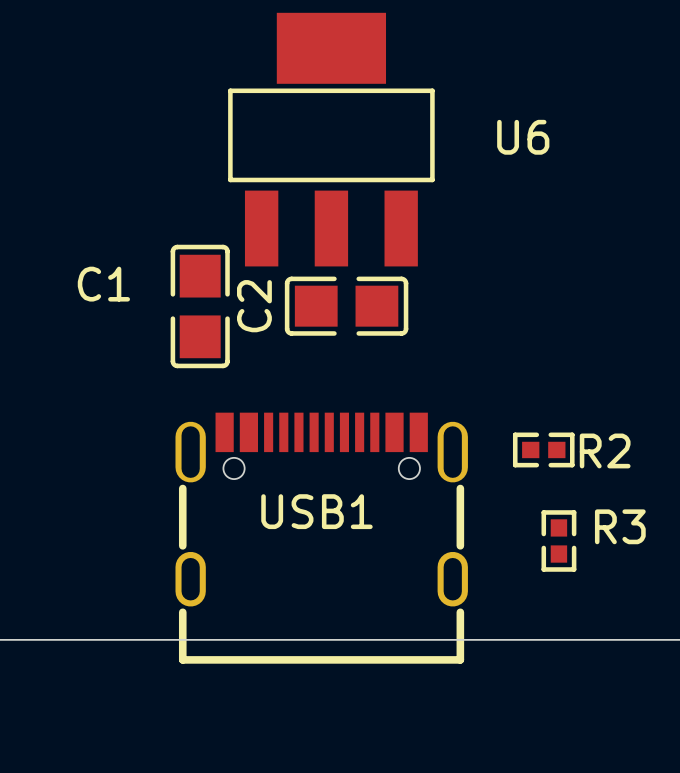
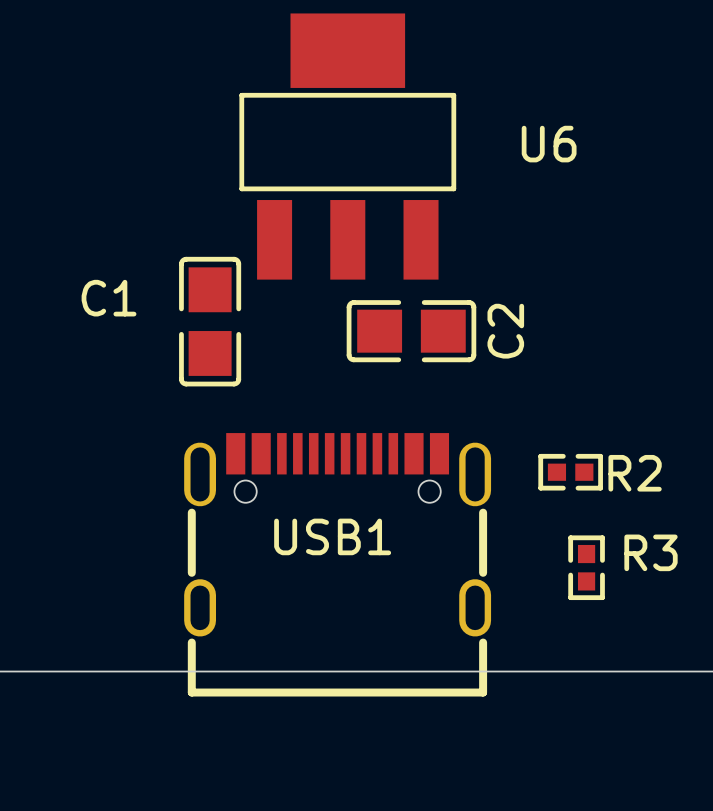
C2 name position: C2 (254, 306) -> C2 (505, 331)
C2 position: (346, 306) -> (411, 331)

